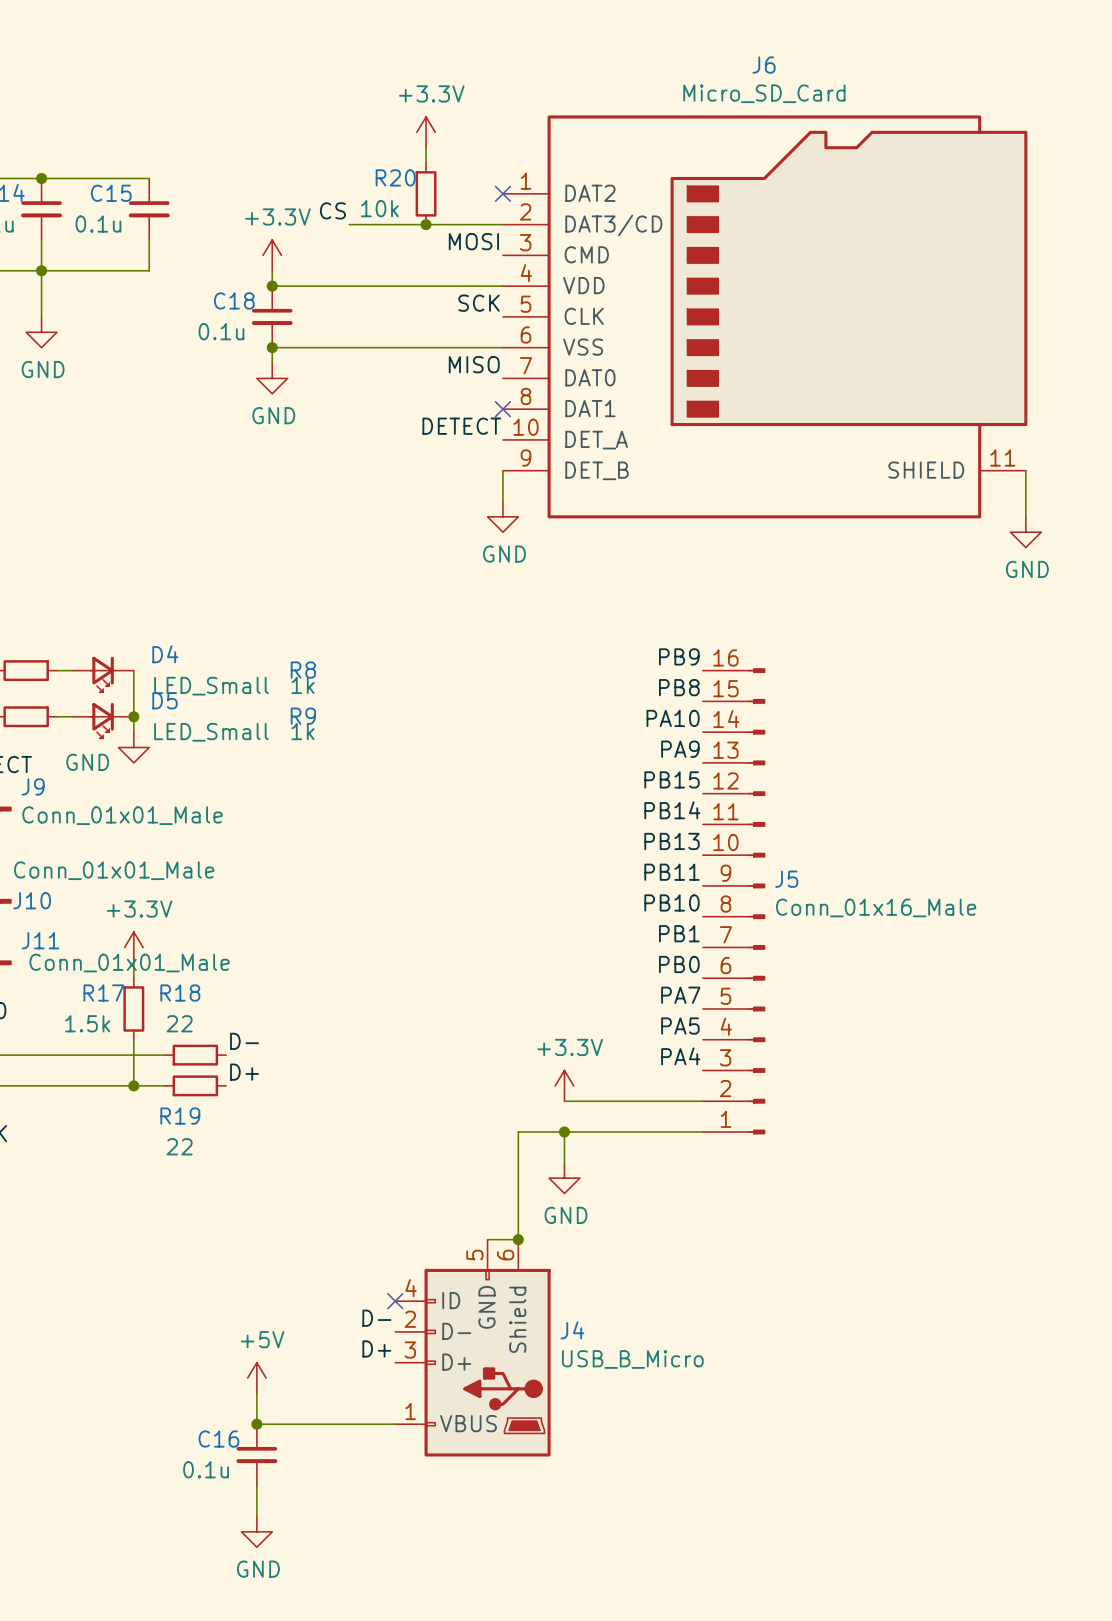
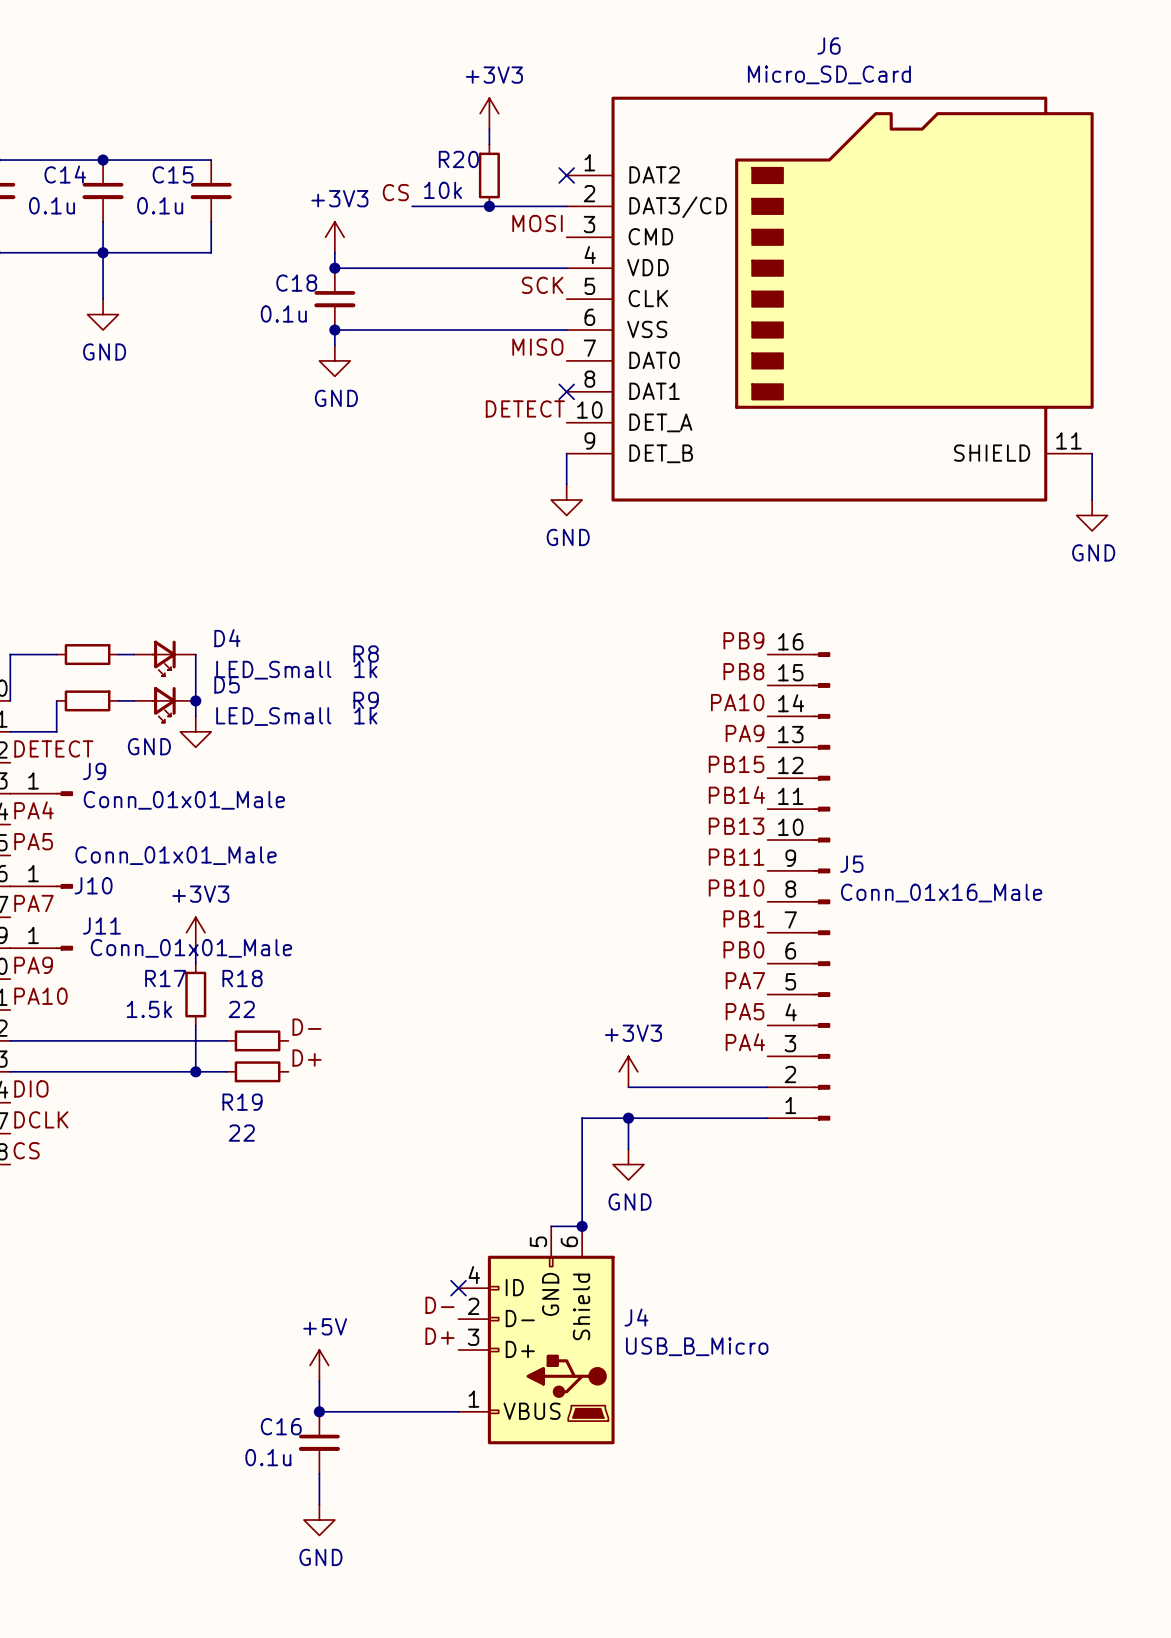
power symbol: +3.3V (426, 132) -> +3V3 (489, 113)
power symbol: +3.3V (272, 255) -> +3V3 (334, 237)
power symbol: +3.3V (133, 947) -> +3V3 (195, 932)
power symbol: +3.3V (564, 1085) -> +3V3 (628, 1071)

